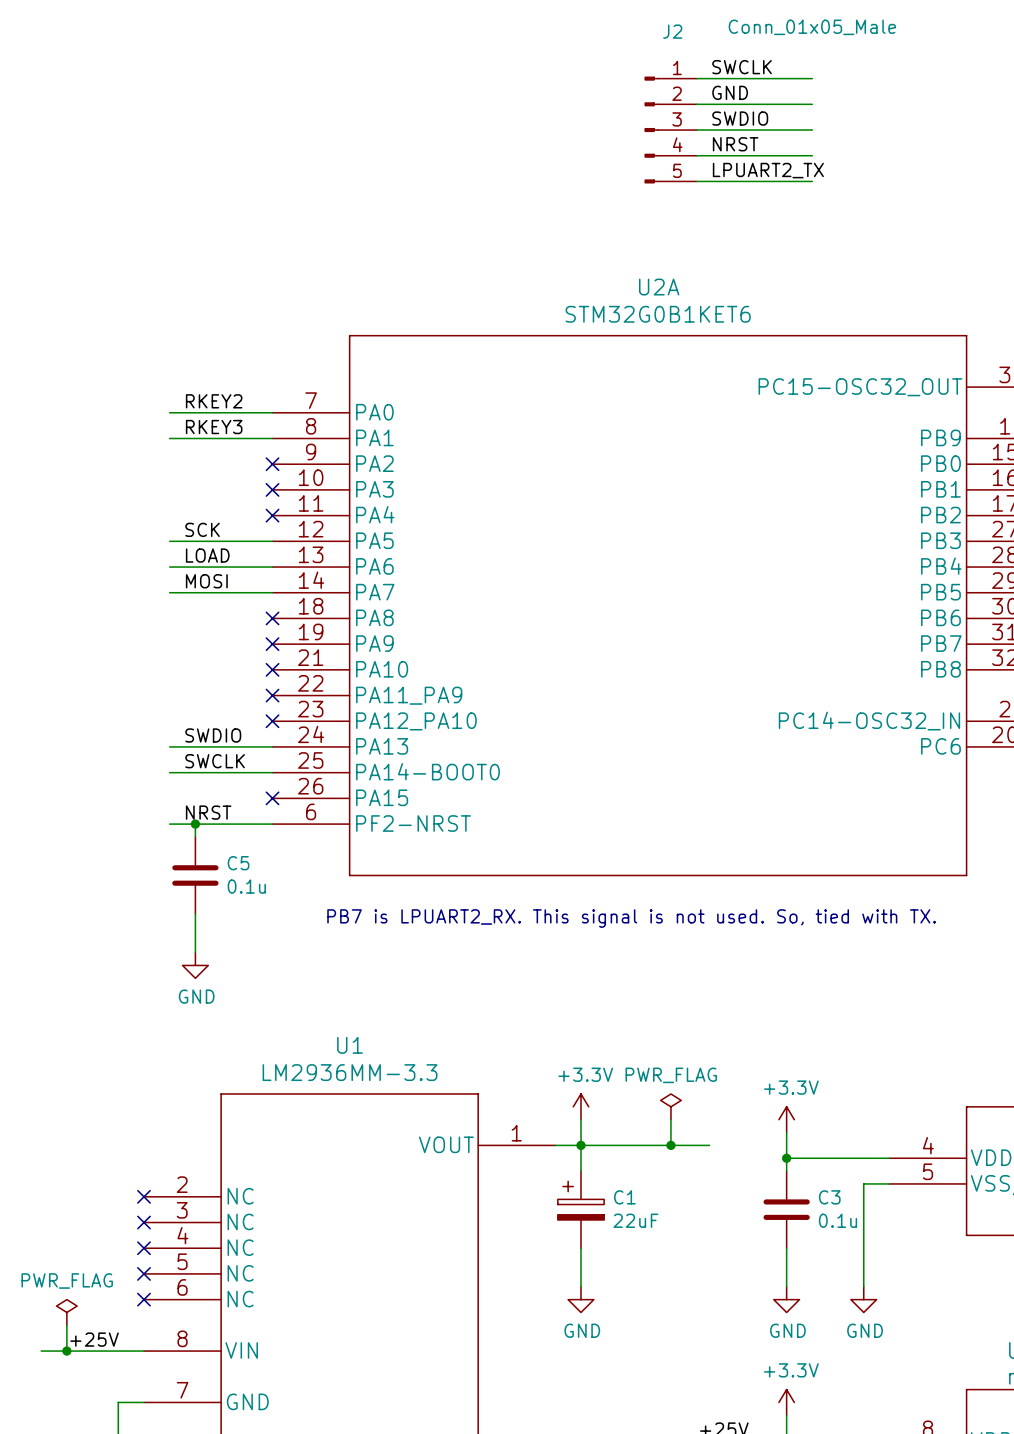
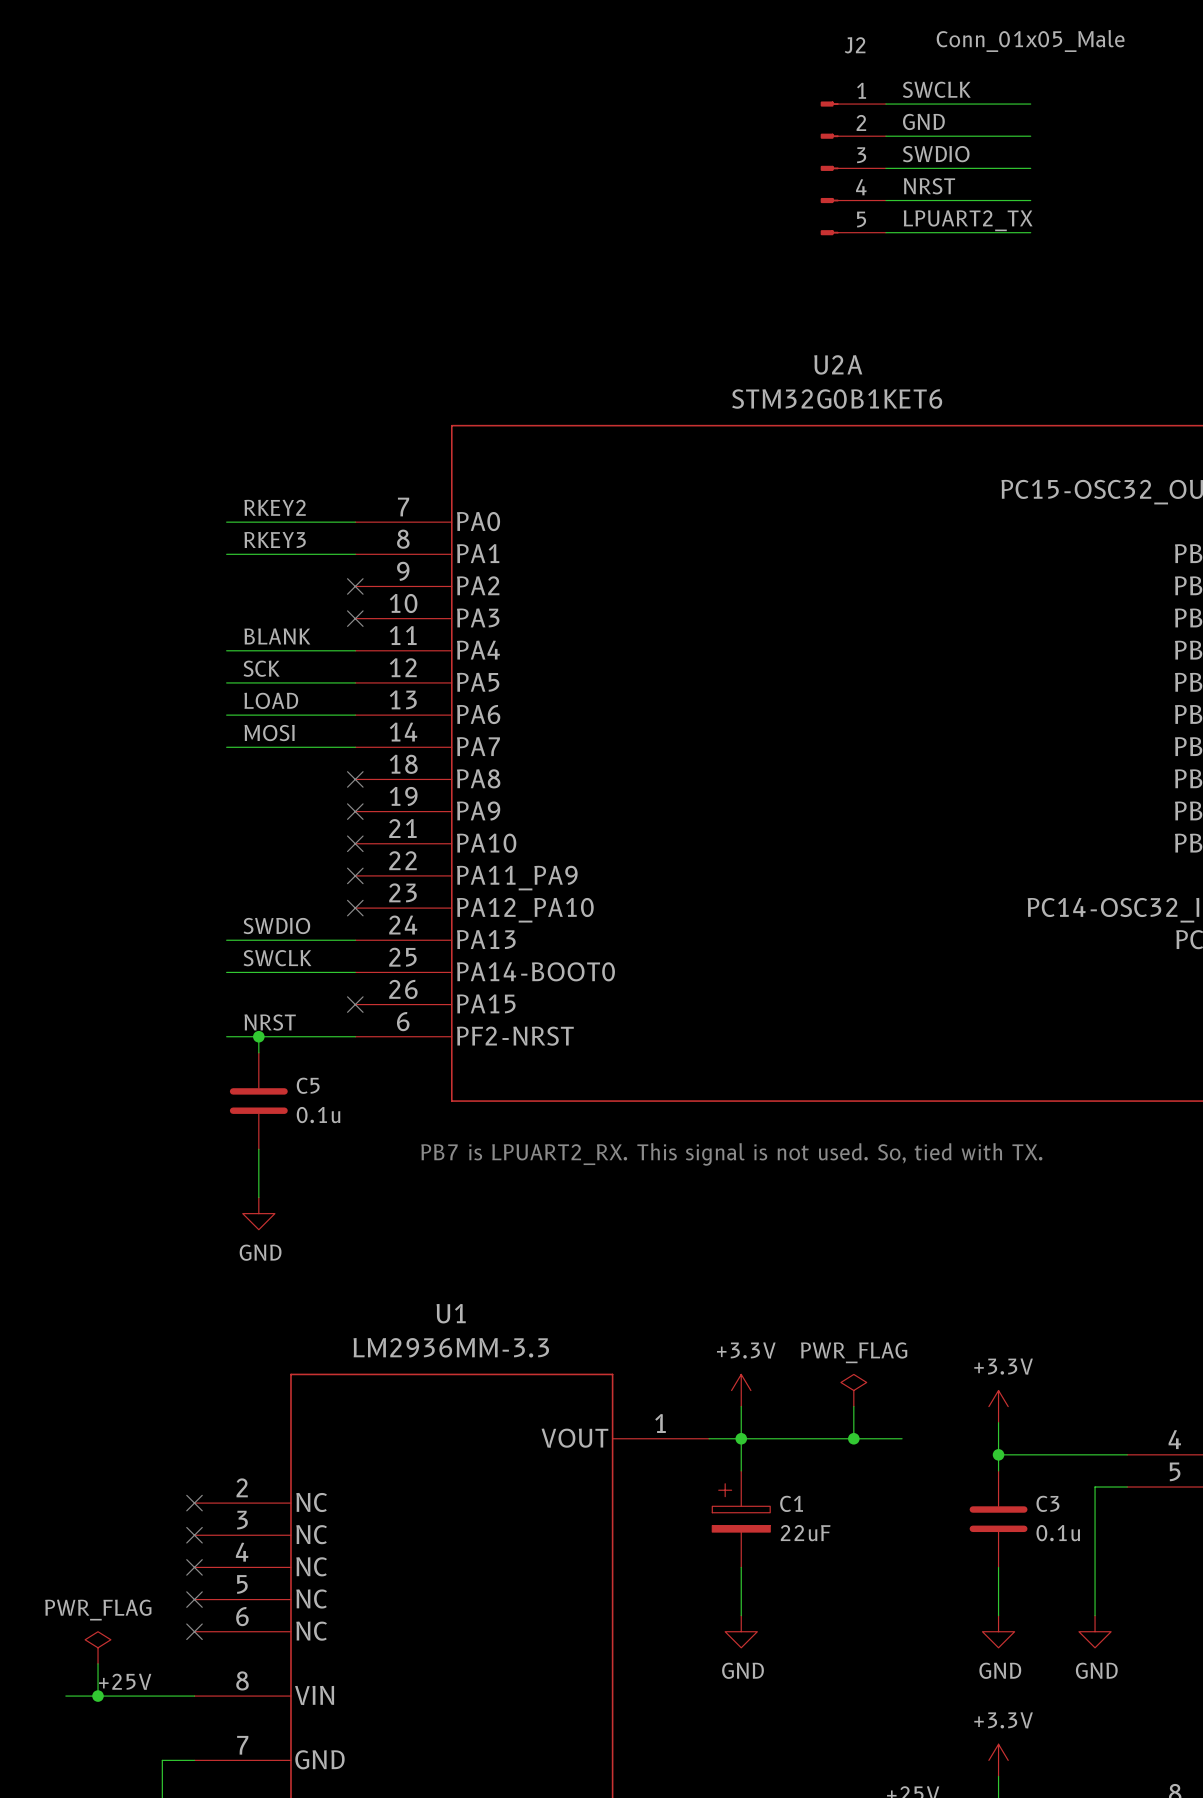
label: none -> BLANK (277, 636)
wire: none -> (226, 650) (355, 650)
no-connect mark: (272, 515) -> none

